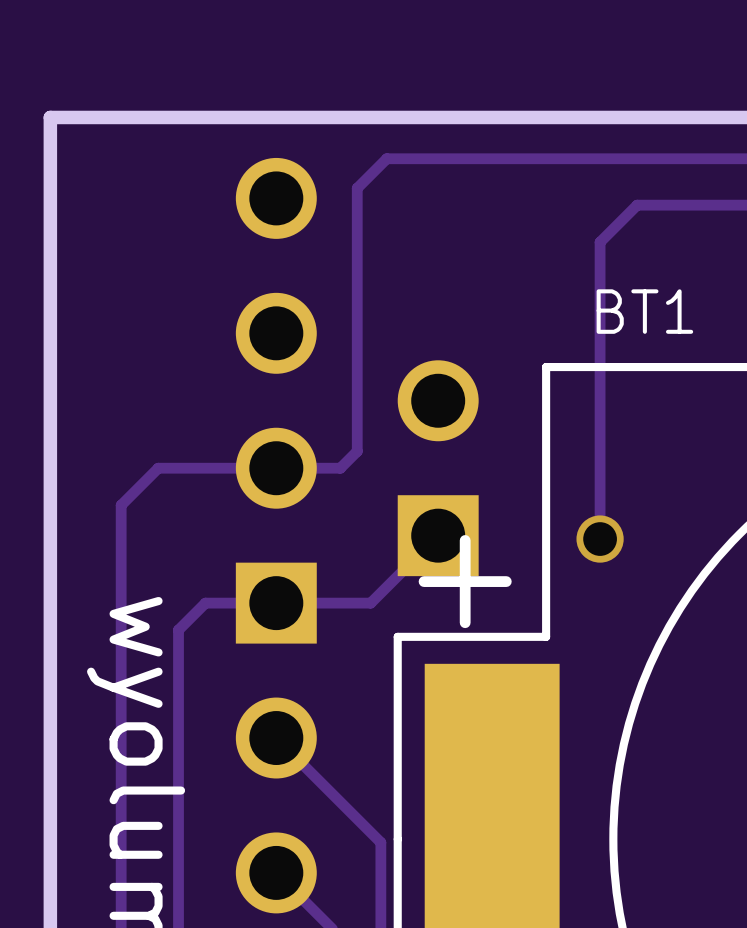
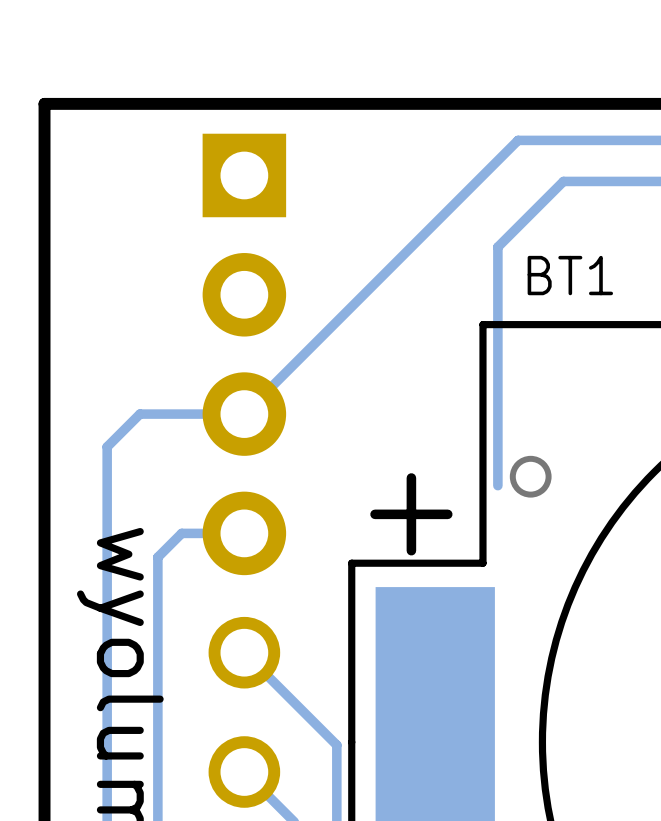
part footprint: [235, 157, 317, 644] -> [202, 133, 287, 576]
track: (585, 158) (386, 158) (357, 188) (357, 451) (340, 468) (276, 468) -> (518, 140) (244, 414)
track: (600, 242) (600, 539) -> (530, 214) (497, 247) (497, 485)
part: (438, 468) -> none
track: (438, 535) (370, 603) (276, 603) -> none

